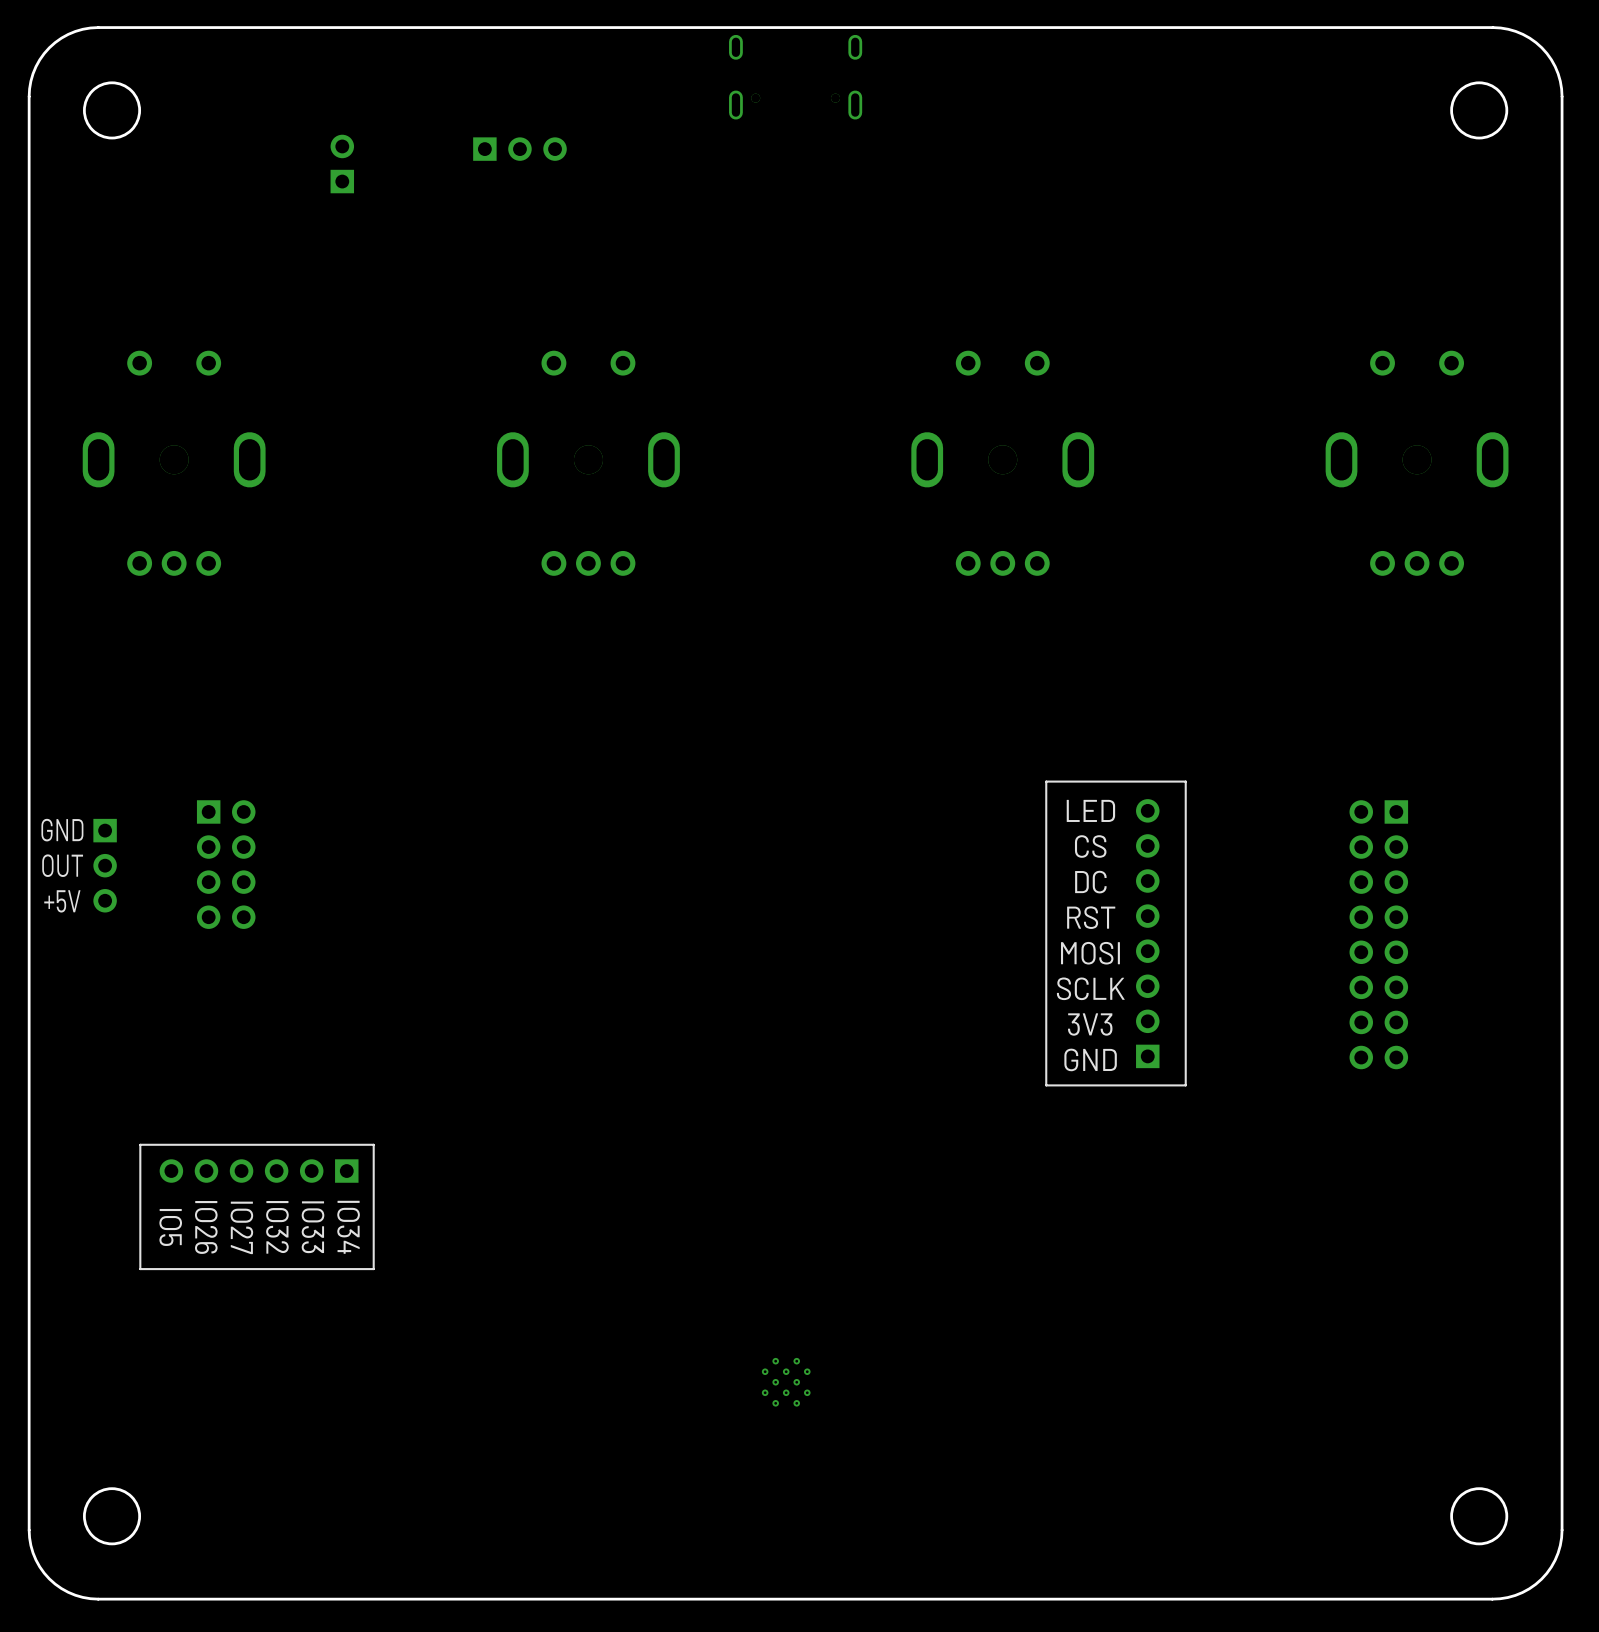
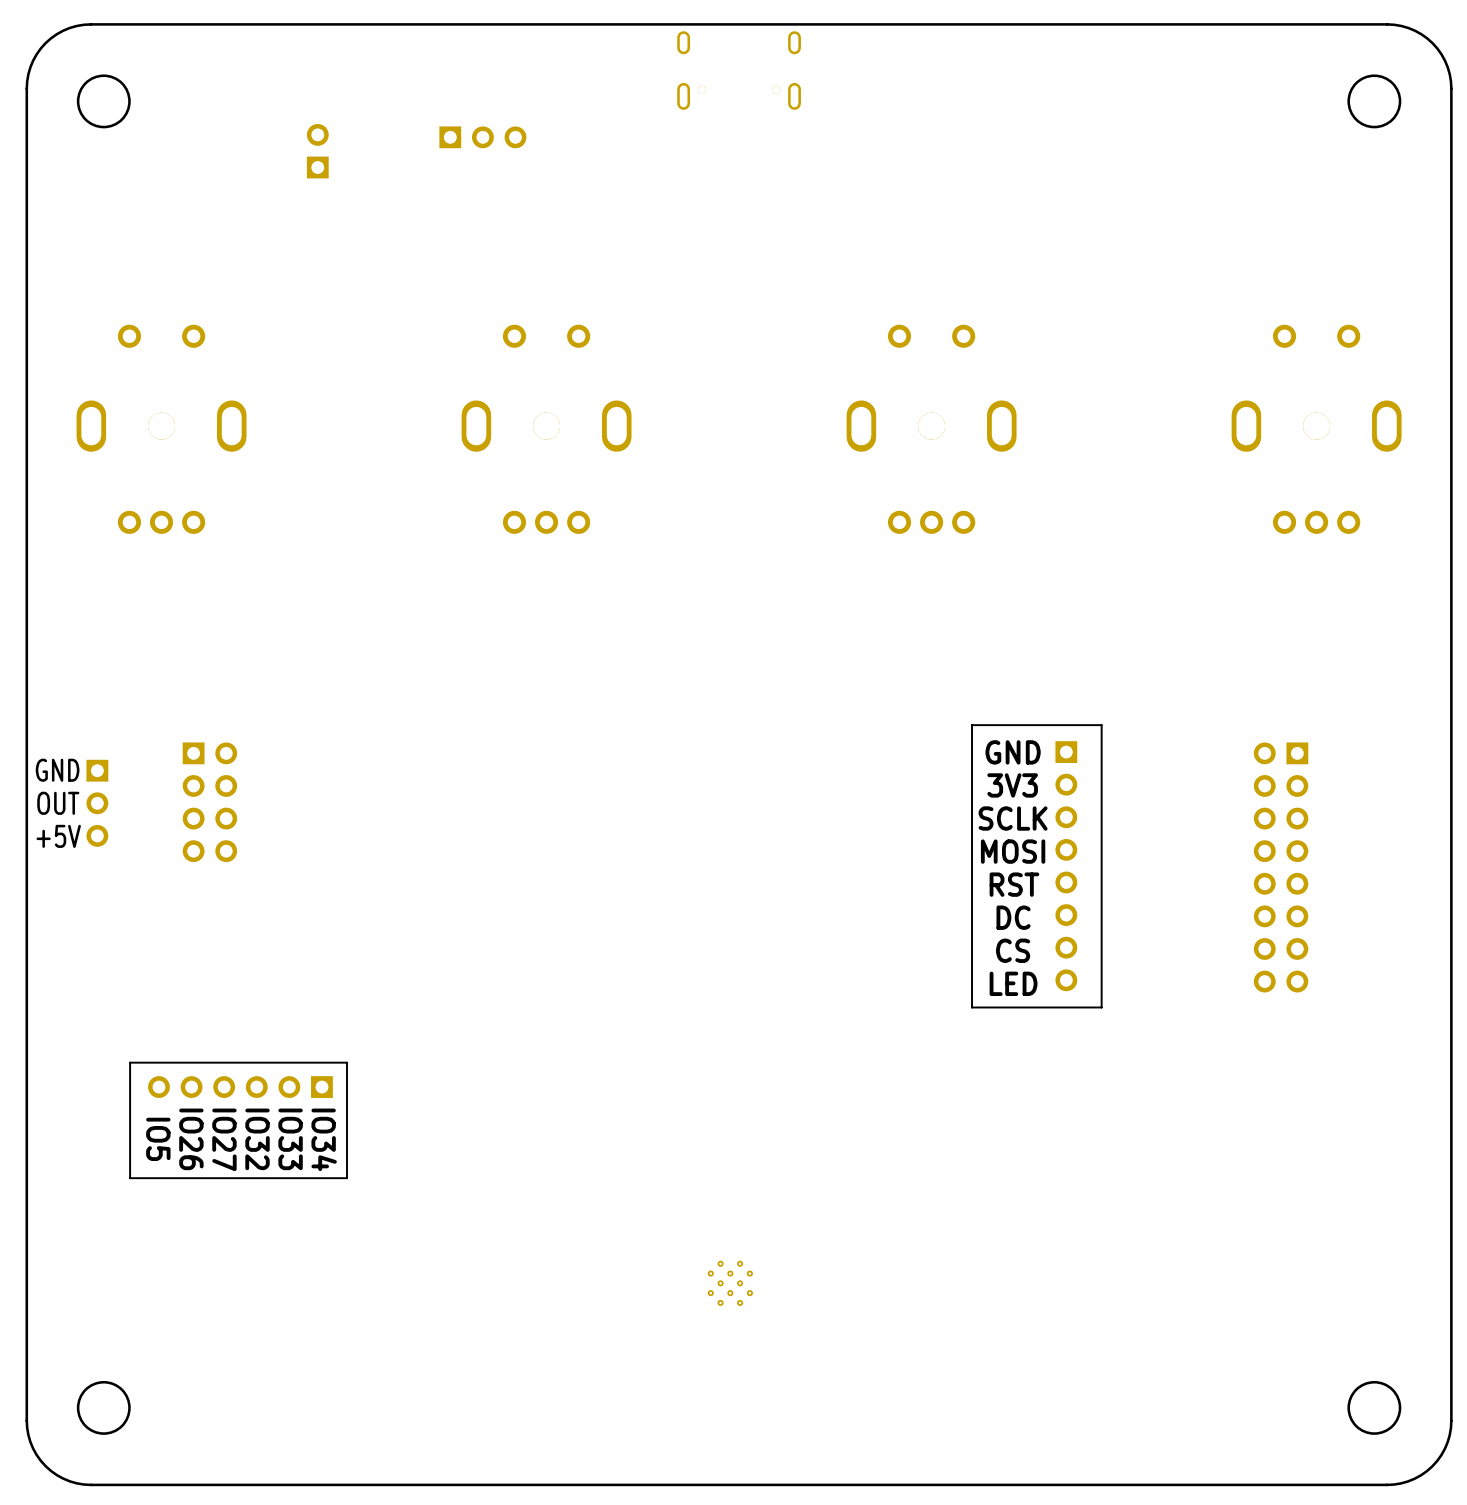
text: LED (1090, 810) -> GND (1013, 752)
text: CS (1090, 846) -> 3V3 (1012, 785)
text: DC (1090, 882) -> SCLK (1013, 818)
text: RST (1091, 917) -> MOSI (1013, 851)
part rotation: 0° (1147, 933) -> 180° (1066, 866)
text: MOSI (1090, 953) -> RST (1014, 884)
text: SCLK (1090, 988) -> DC (1013, 917)
text: 3V3 (1090, 1024) -> CS (1013, 950)
text: GND (1090, 1059) -> LED (1013, 983)

